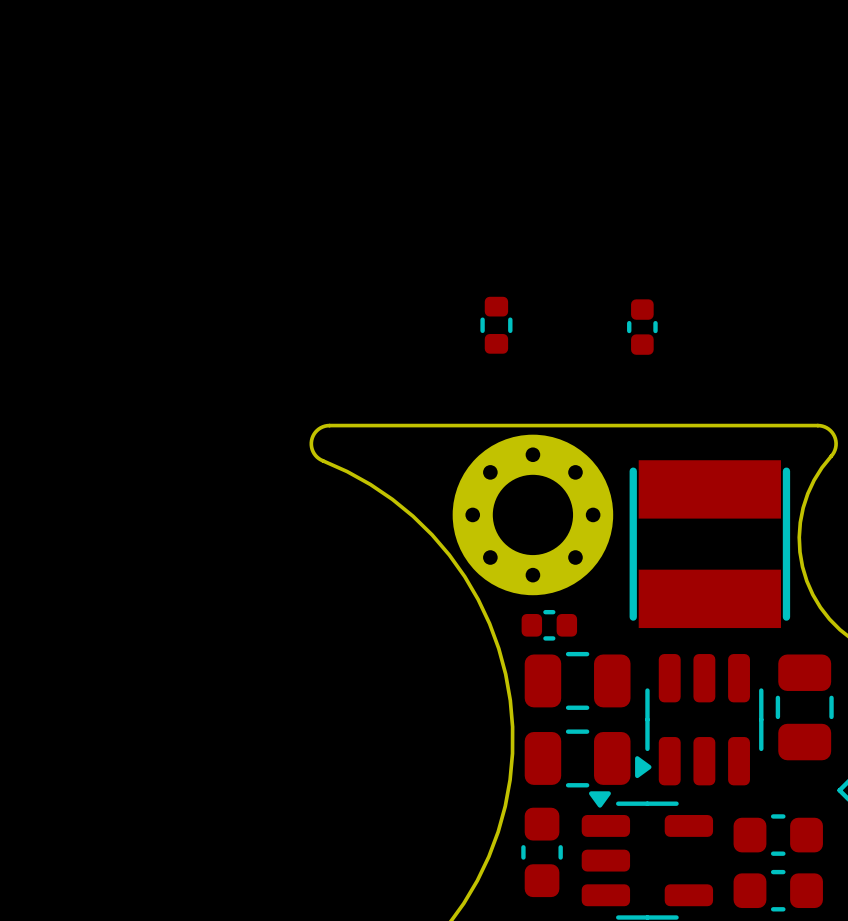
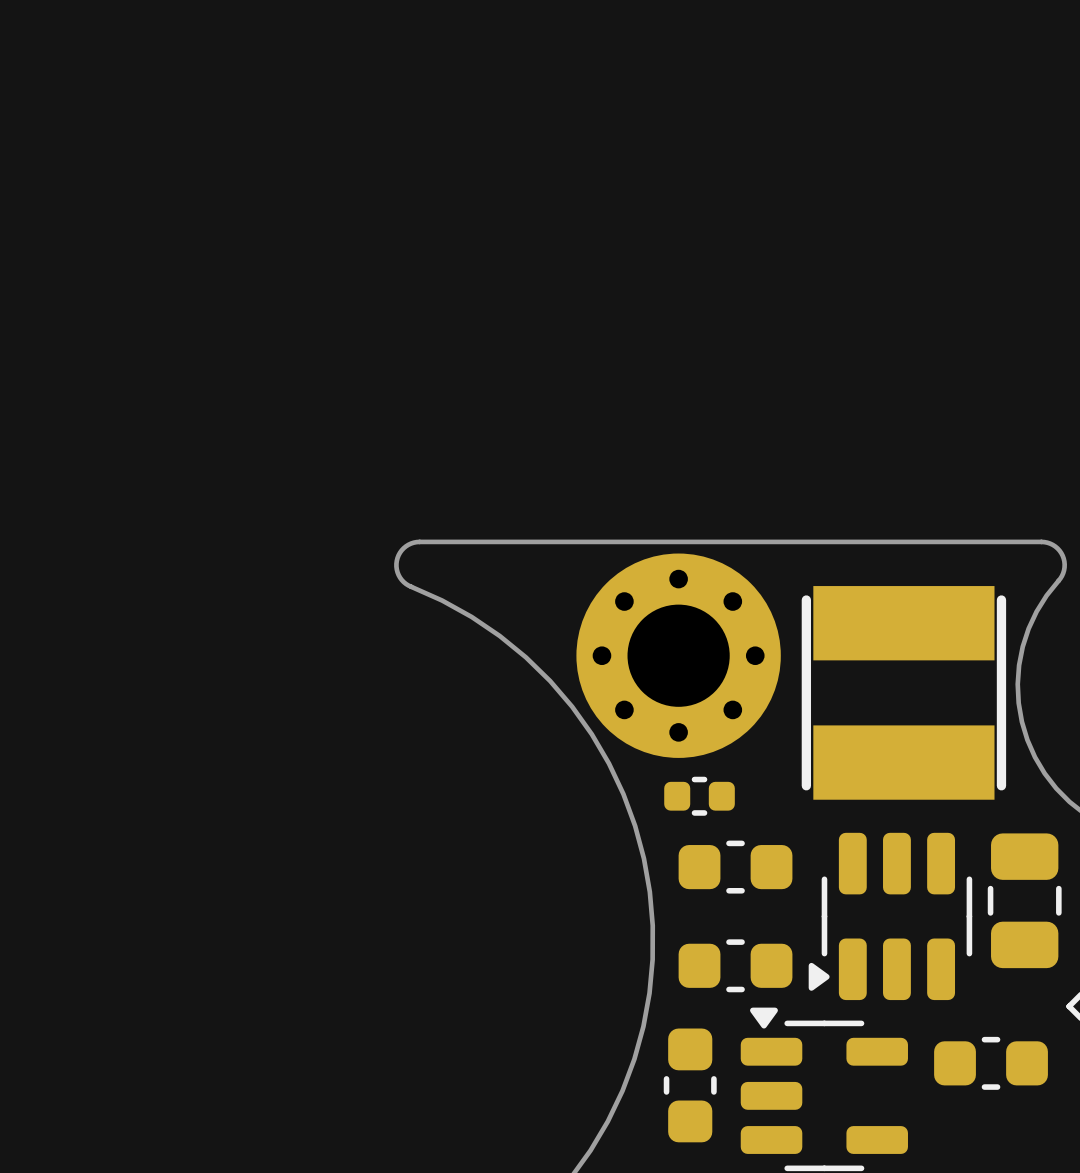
part: (496, 325) -> none
part: (642, 327) -> none
part footprint: [524, 651, 631, 710] -> [678, 840, 793, 894]
part footprint: [524, 729, 631, 788] -> [678, 939, 793, 993]
part: (778, 890) -> none

